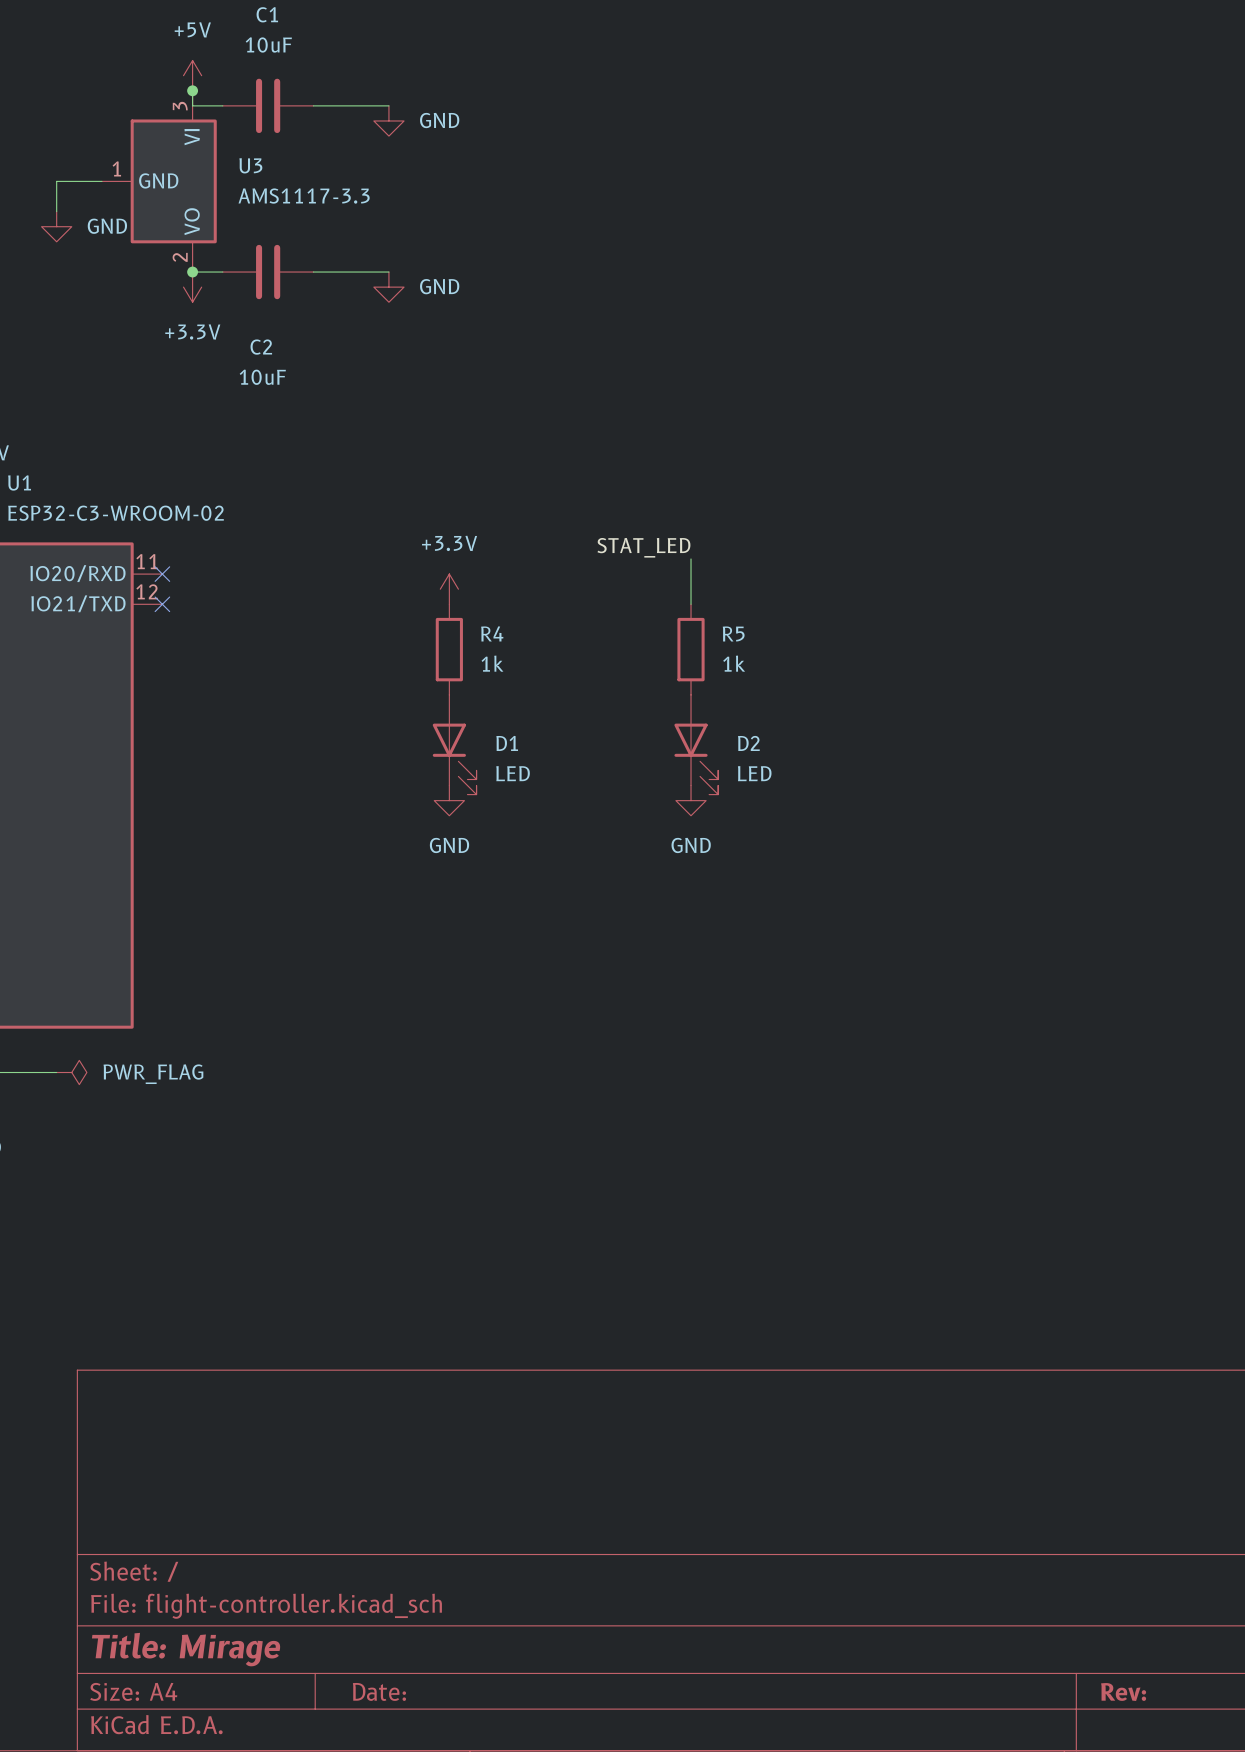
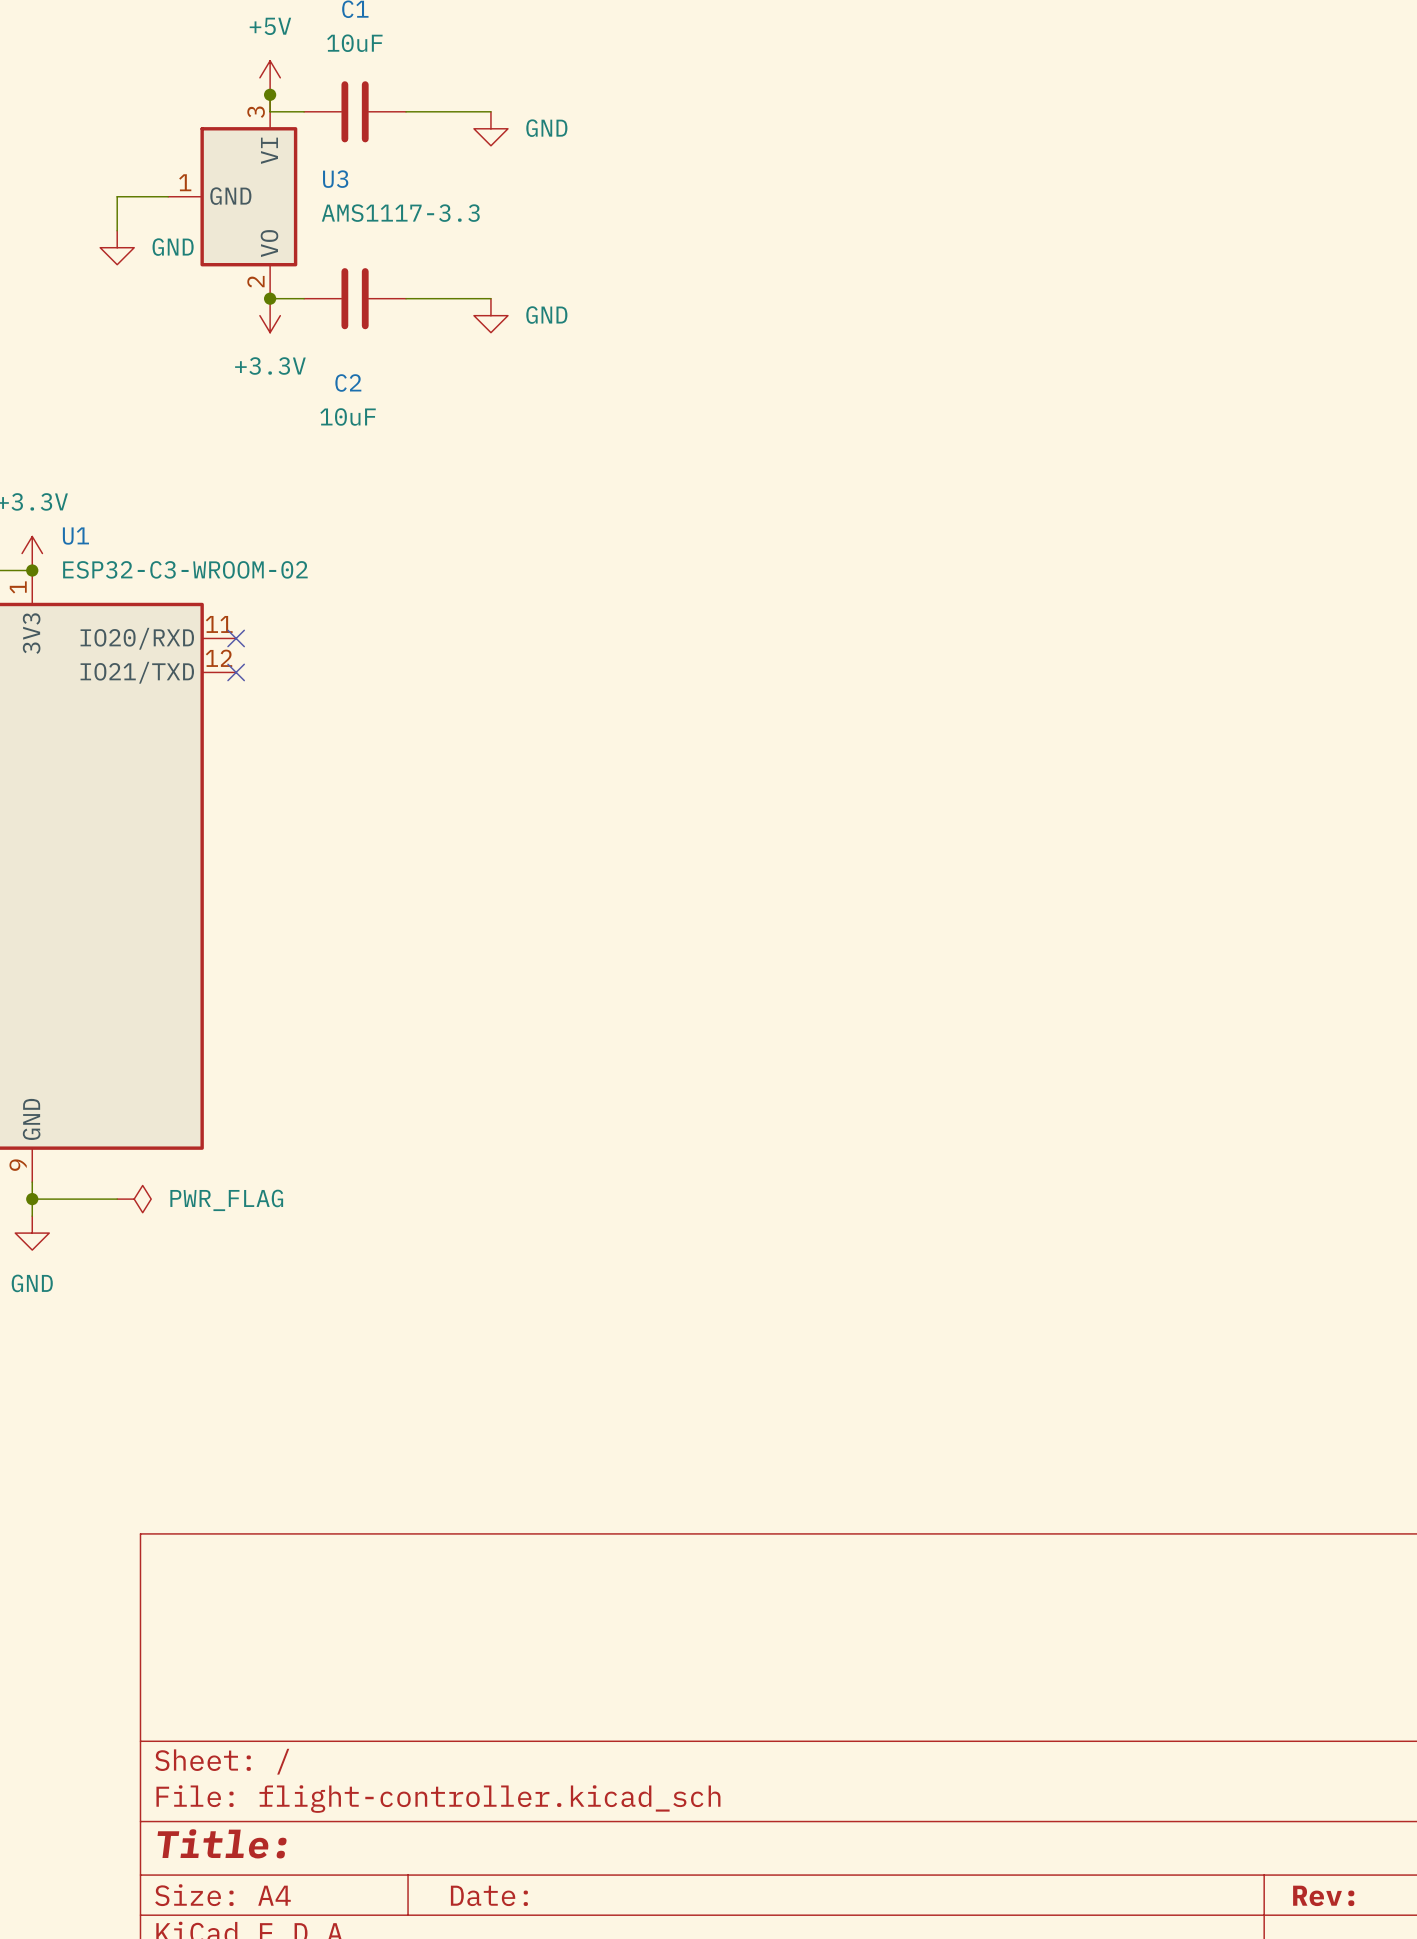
label: STAT_LED (643, 547) -> none
wire: (691, 558) (691, 604) -> none
power symbol: +3.3V (449, 589) -> none
R4: 1k (449, 649) -> none
R5: 1k (691, 649) -> none
D1: LED (454, 744) -> none
D2: LED (696, 744) -> none
power symbol: GND (449, 800) -> none
power symbol: GND (691, 800) -> none
title block: Title: Mirage (186, 1649) -> Title: (222, 1843)

